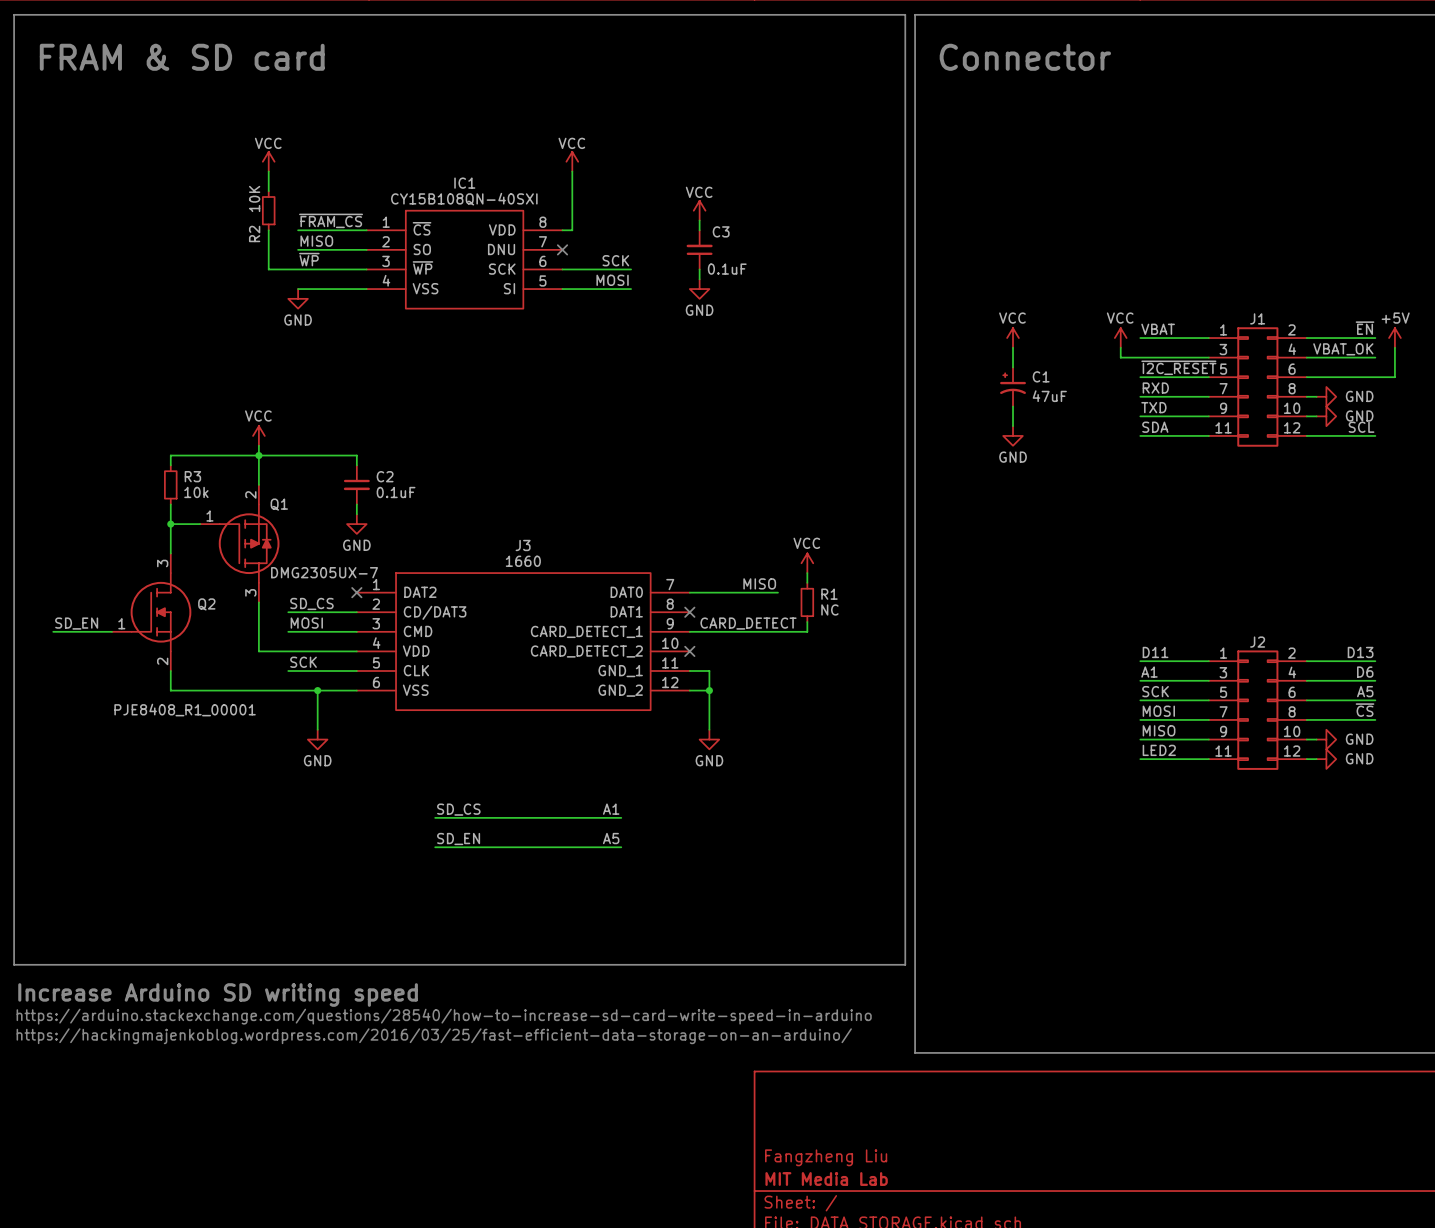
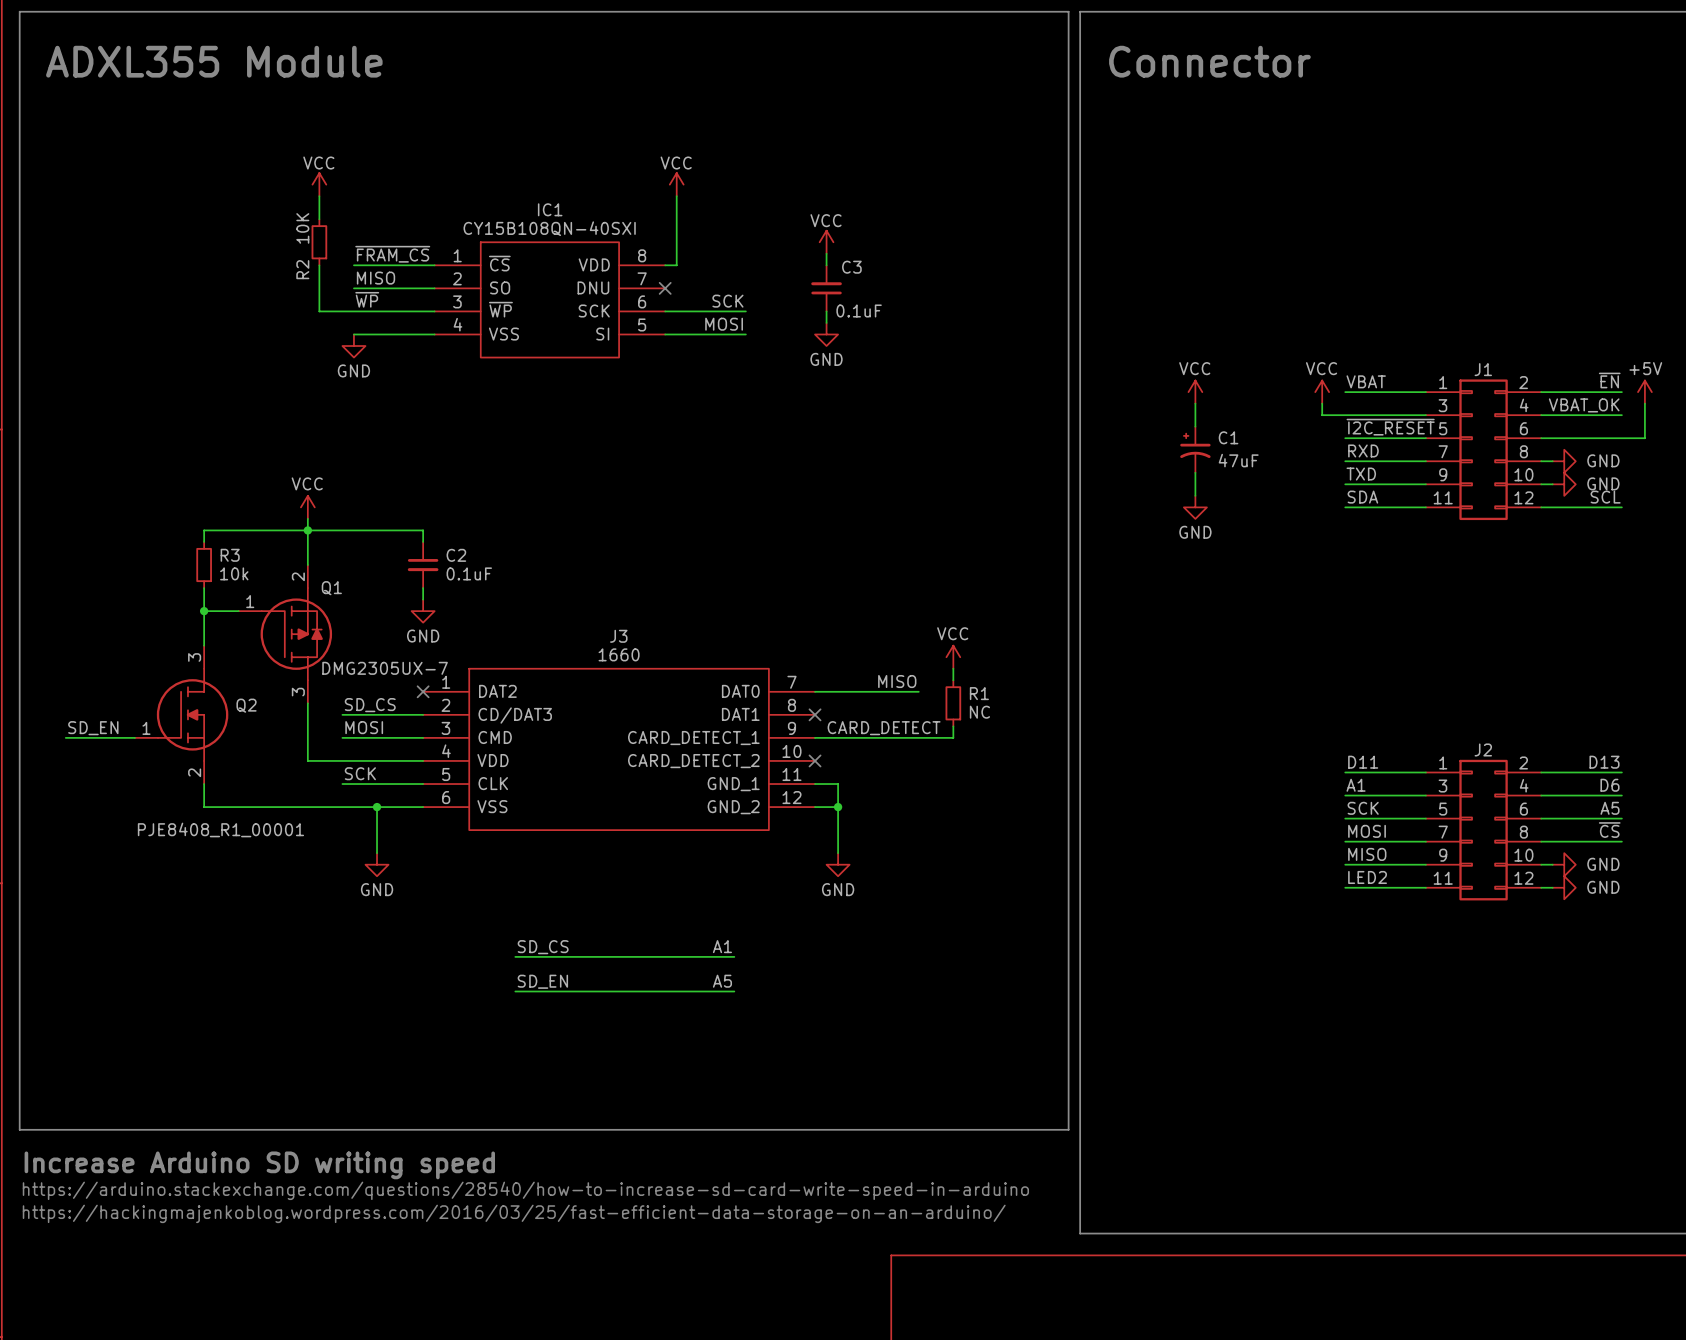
text: FRAM & SD card (182, 57) -> ADXL355 Module (214, 61)

